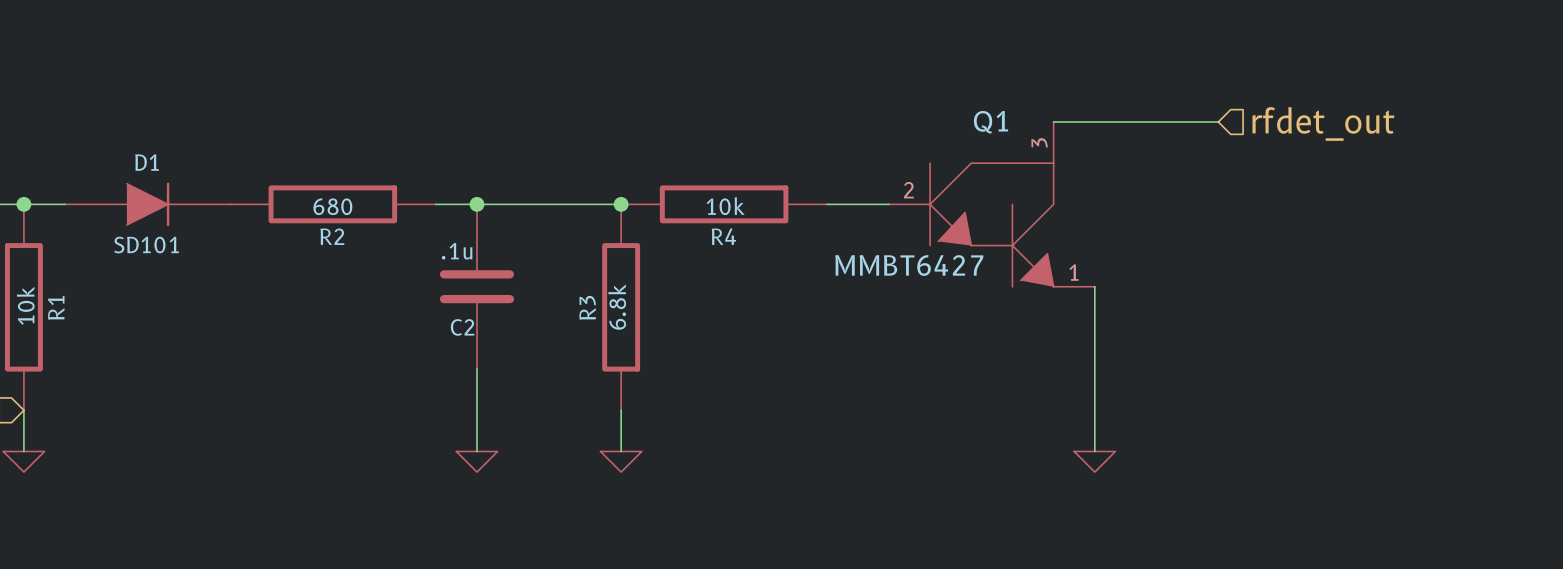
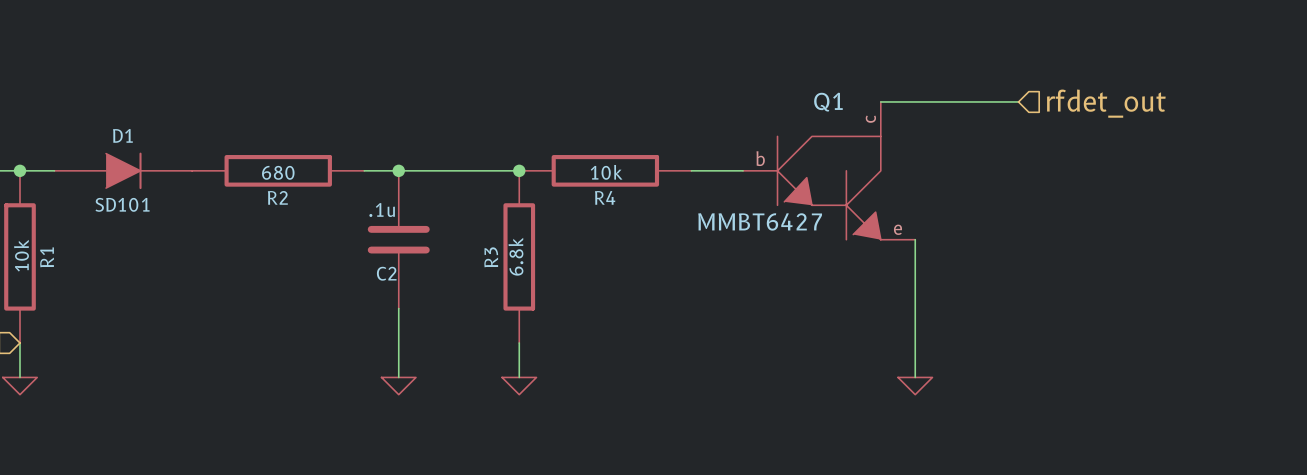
Q1 pin number: 3 (1039, 142) -> c (870, 119)
Q1 pin number: 2 (908, 190) -> b (760, 158)
Q1 pin number: 1 (1073, 272) -> e (897, 229)

